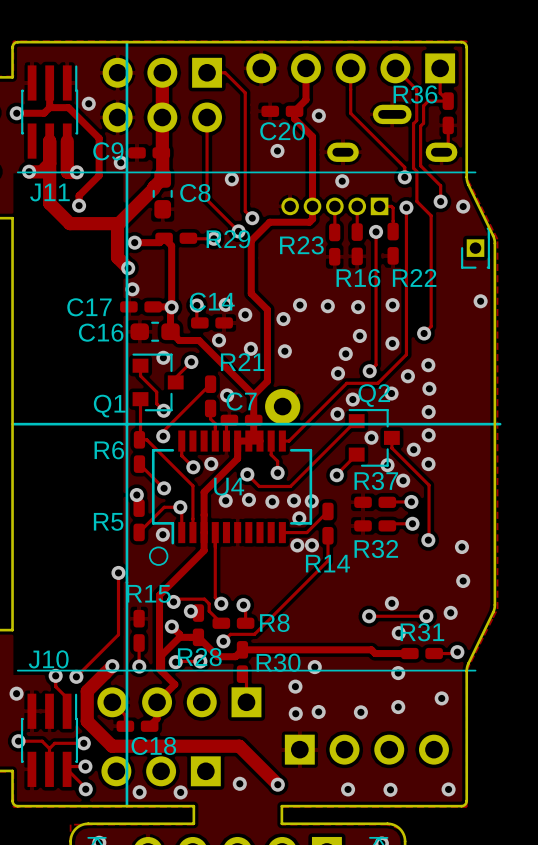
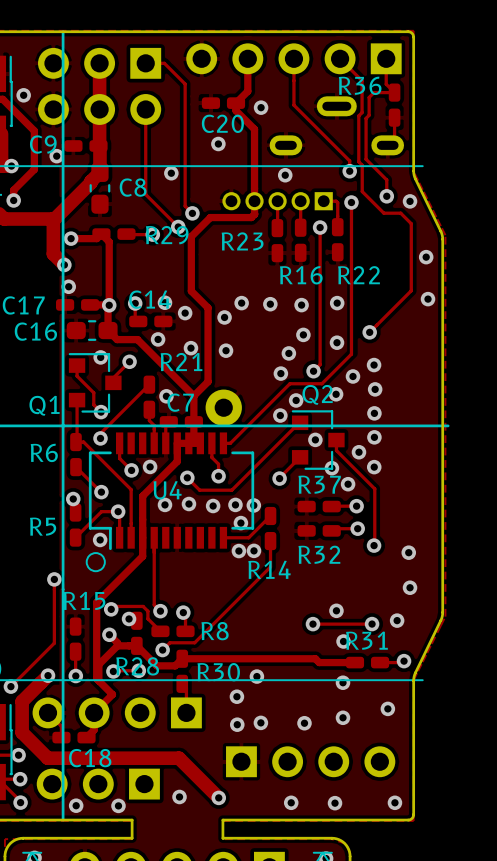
track: (416, 197) (416, 201) (431, 215) (431, 326) -> (362, 191) (383, 213) (400, 213) (411, 223) (411, 290) (376, 325)
part: (475, 248) -> none
via: none -> (426, 257)

